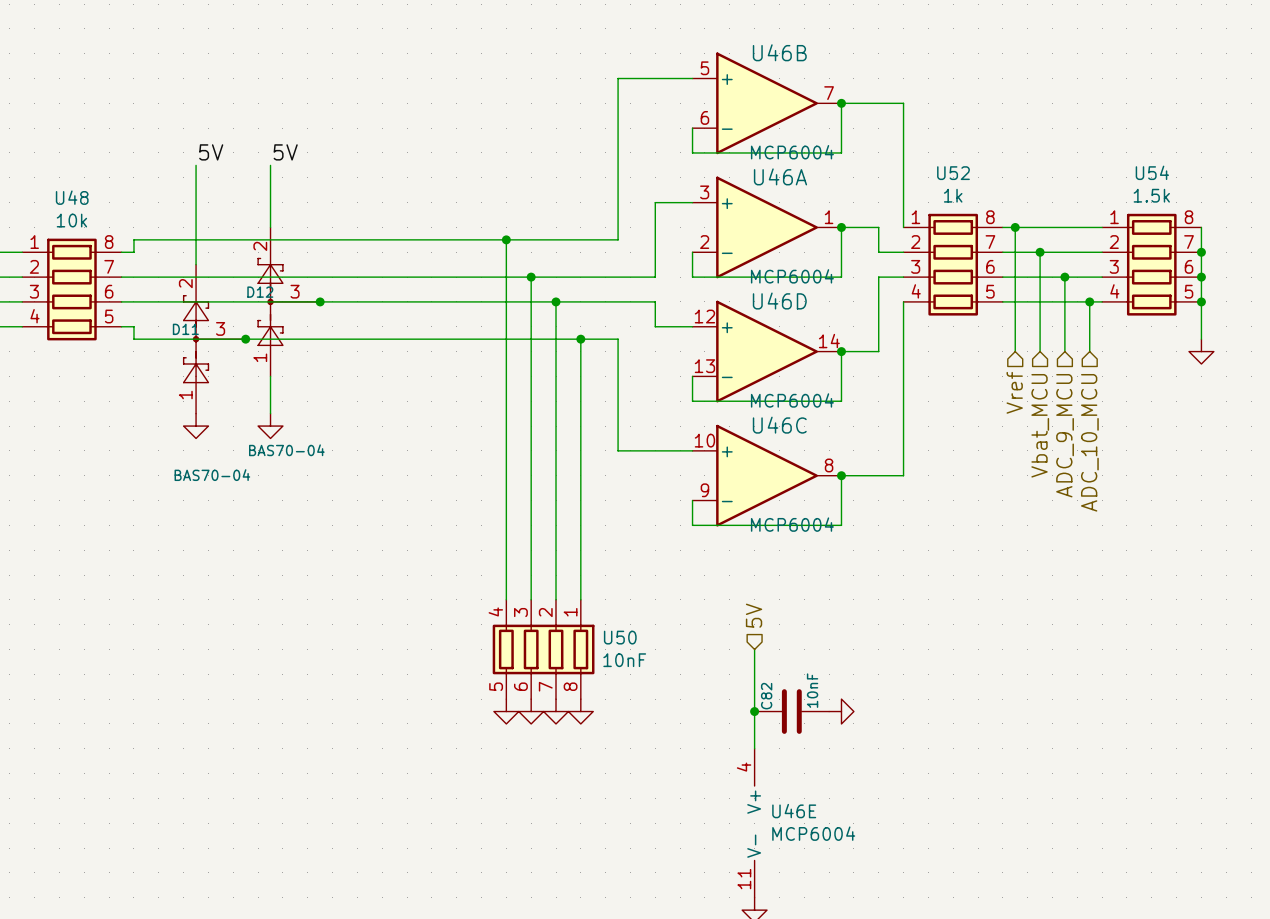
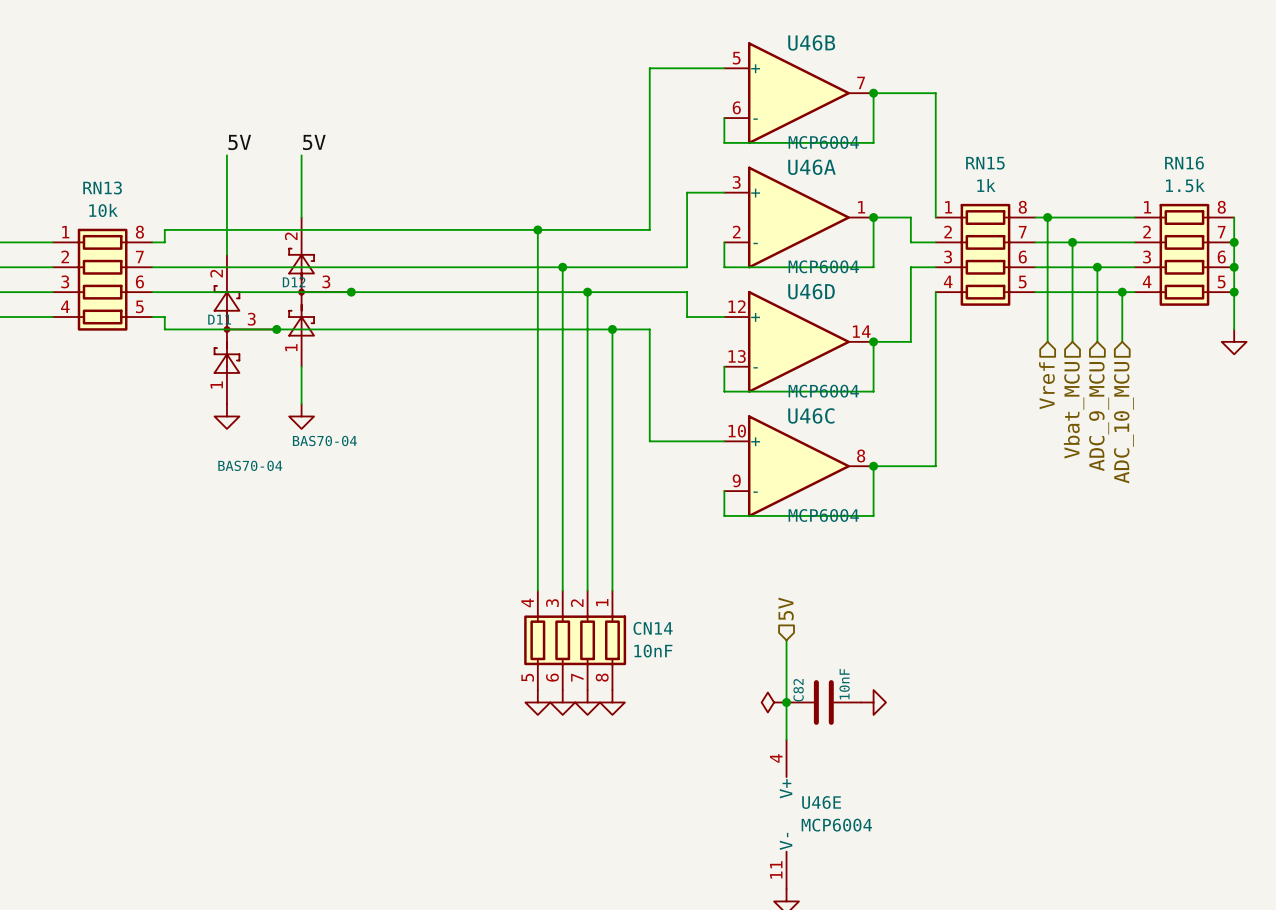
U54 name: U54 (1152, 172) -> RN16 (1184, 163)
U52 name: U52 (953, 173) -> RN15 (985, 163)
U48 name: U48 (72, 197) -> RN13 (102, 187)
U50 name: U50 (620, 637) -> CN14 (653, 628)
power symbol: none -> (774, 702)

